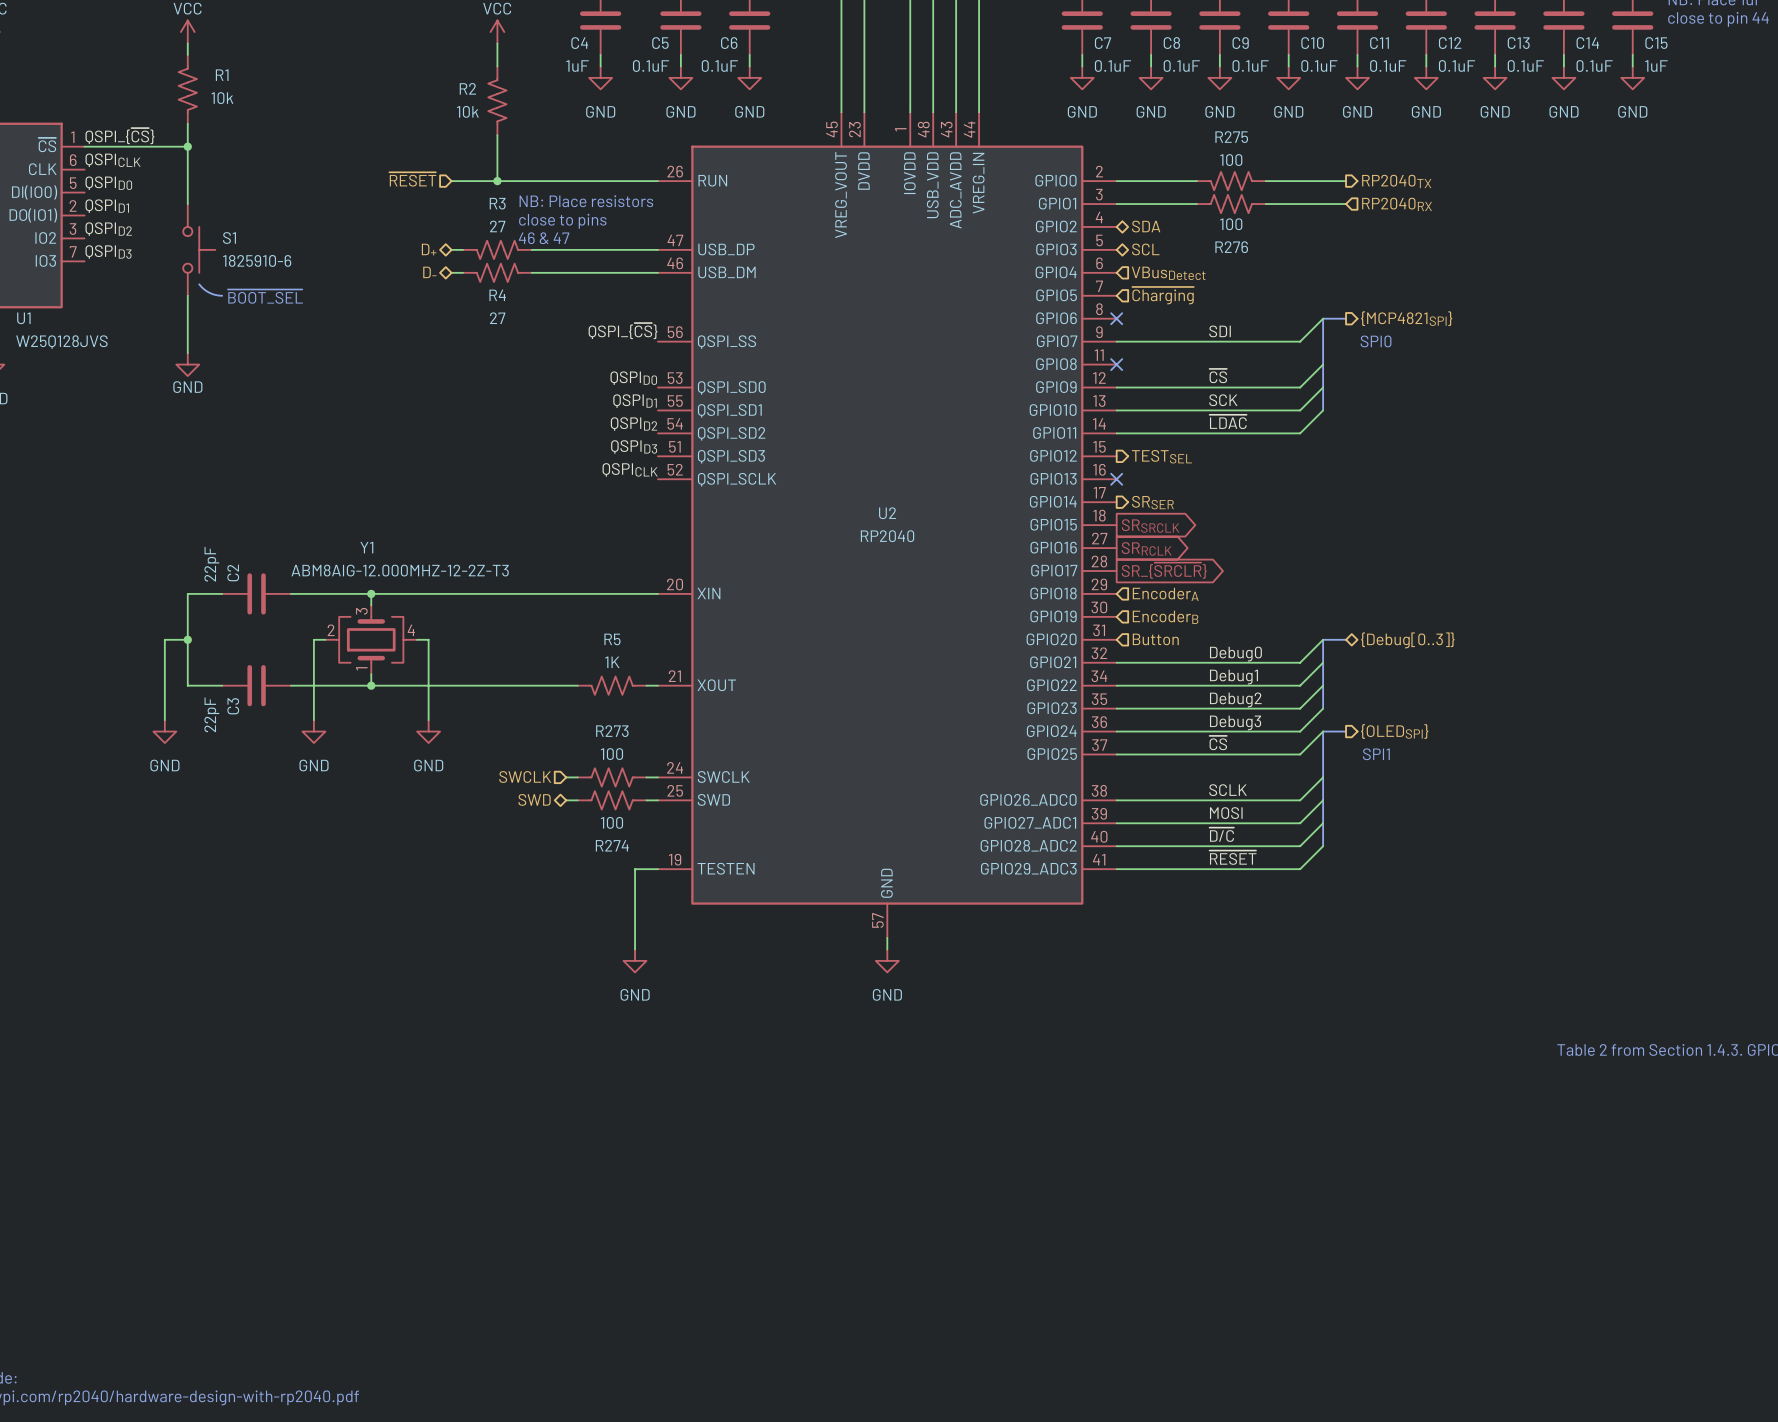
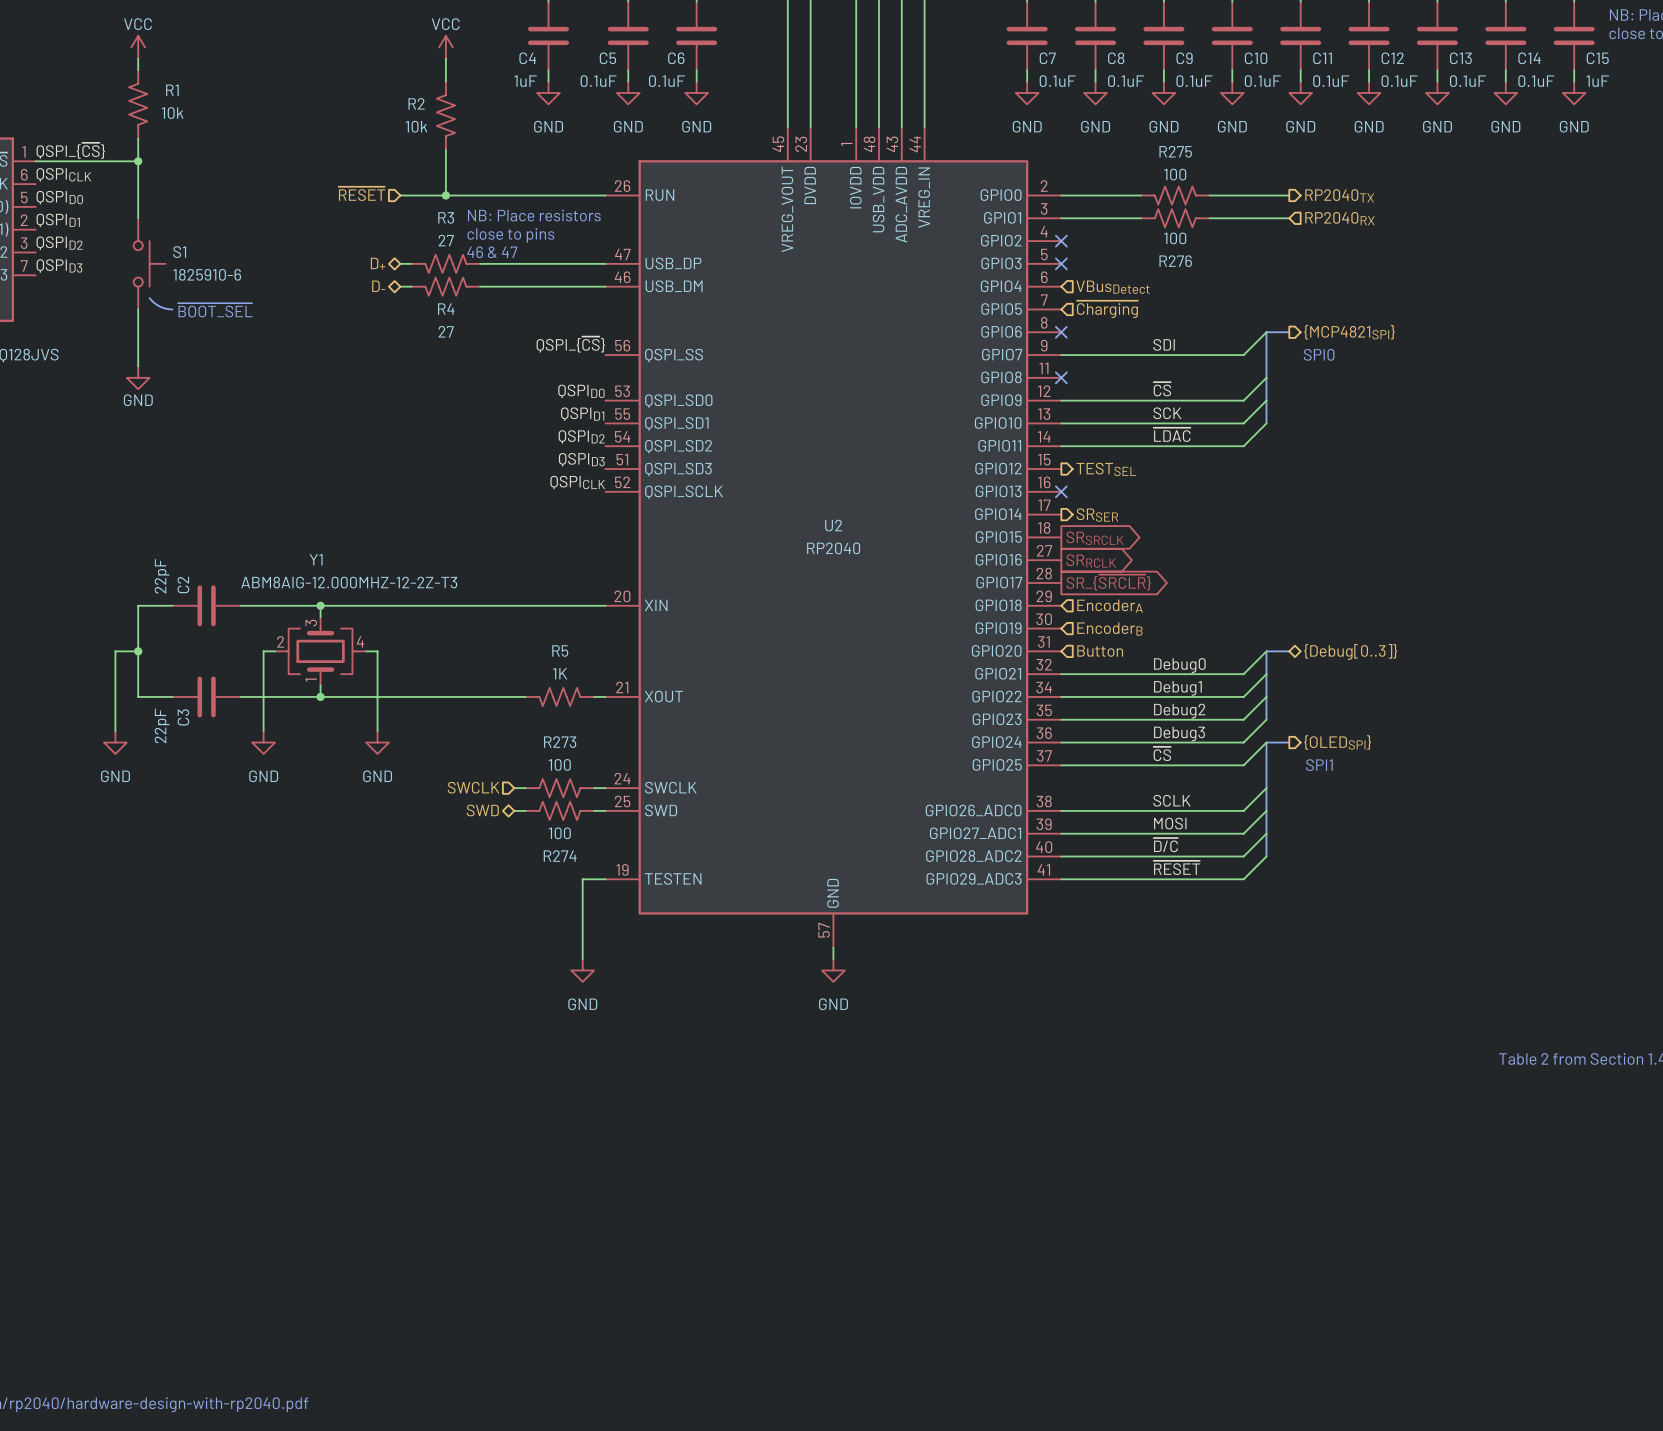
no-connect mark: none -> (1061, 241)
hierarchical label: SDA (1146, 226) -> none
no-connect mark: none -> (1061, 263)
hierarchical label: SCL (1145, 249) -> none

